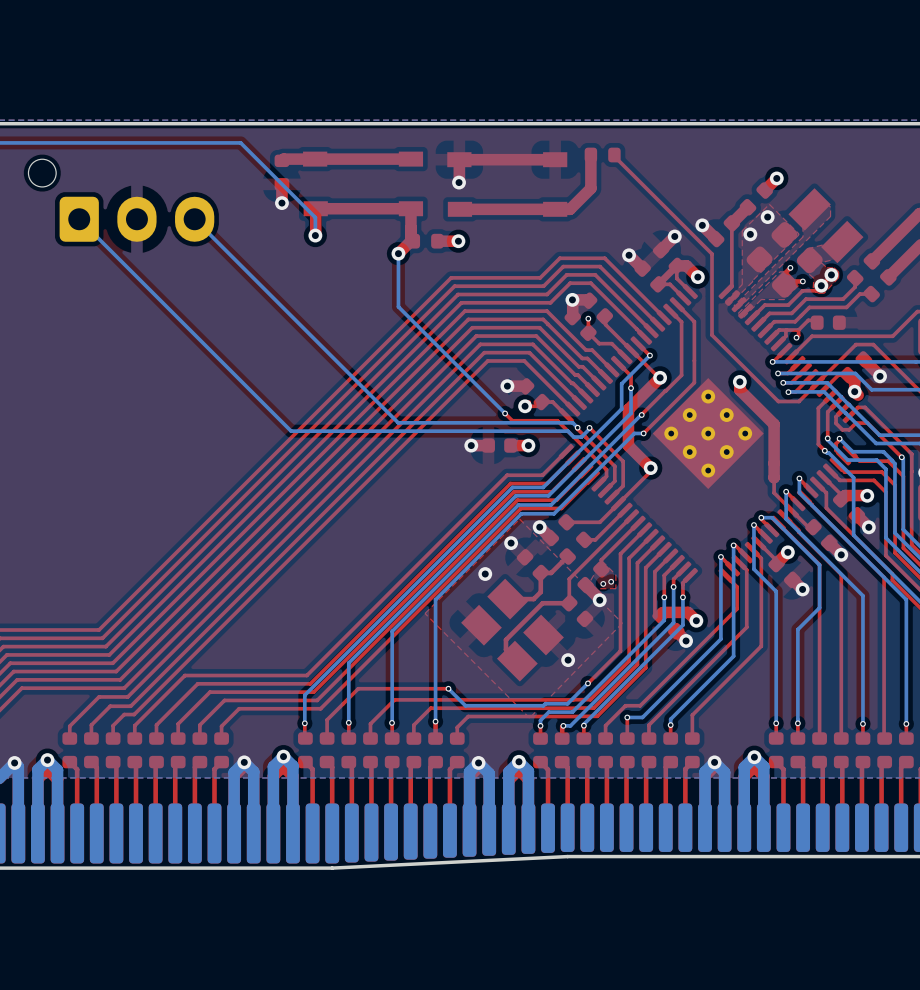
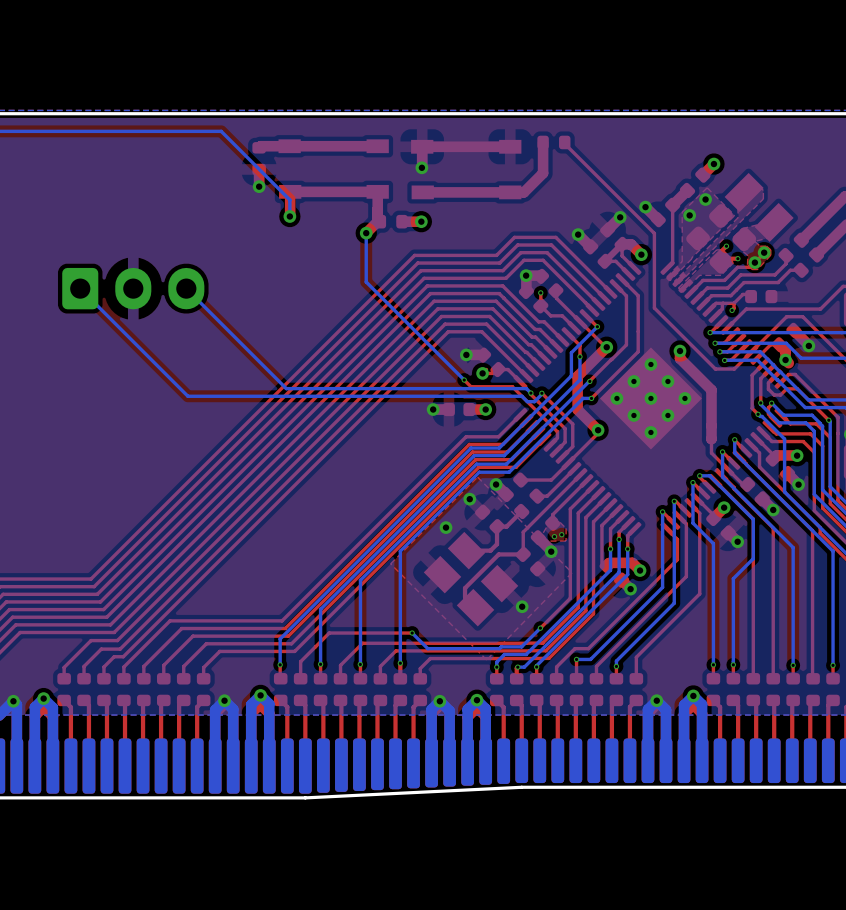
part: (121, 200) -> none
bottom track: (79, 219) (291, 431) -> (80, 288) (187, 396) (267, 396)
bottom track: (194, 219) (398, 422) -> (186, 288) (286, 388) (366, 388)
part: none -> (133, 288)

